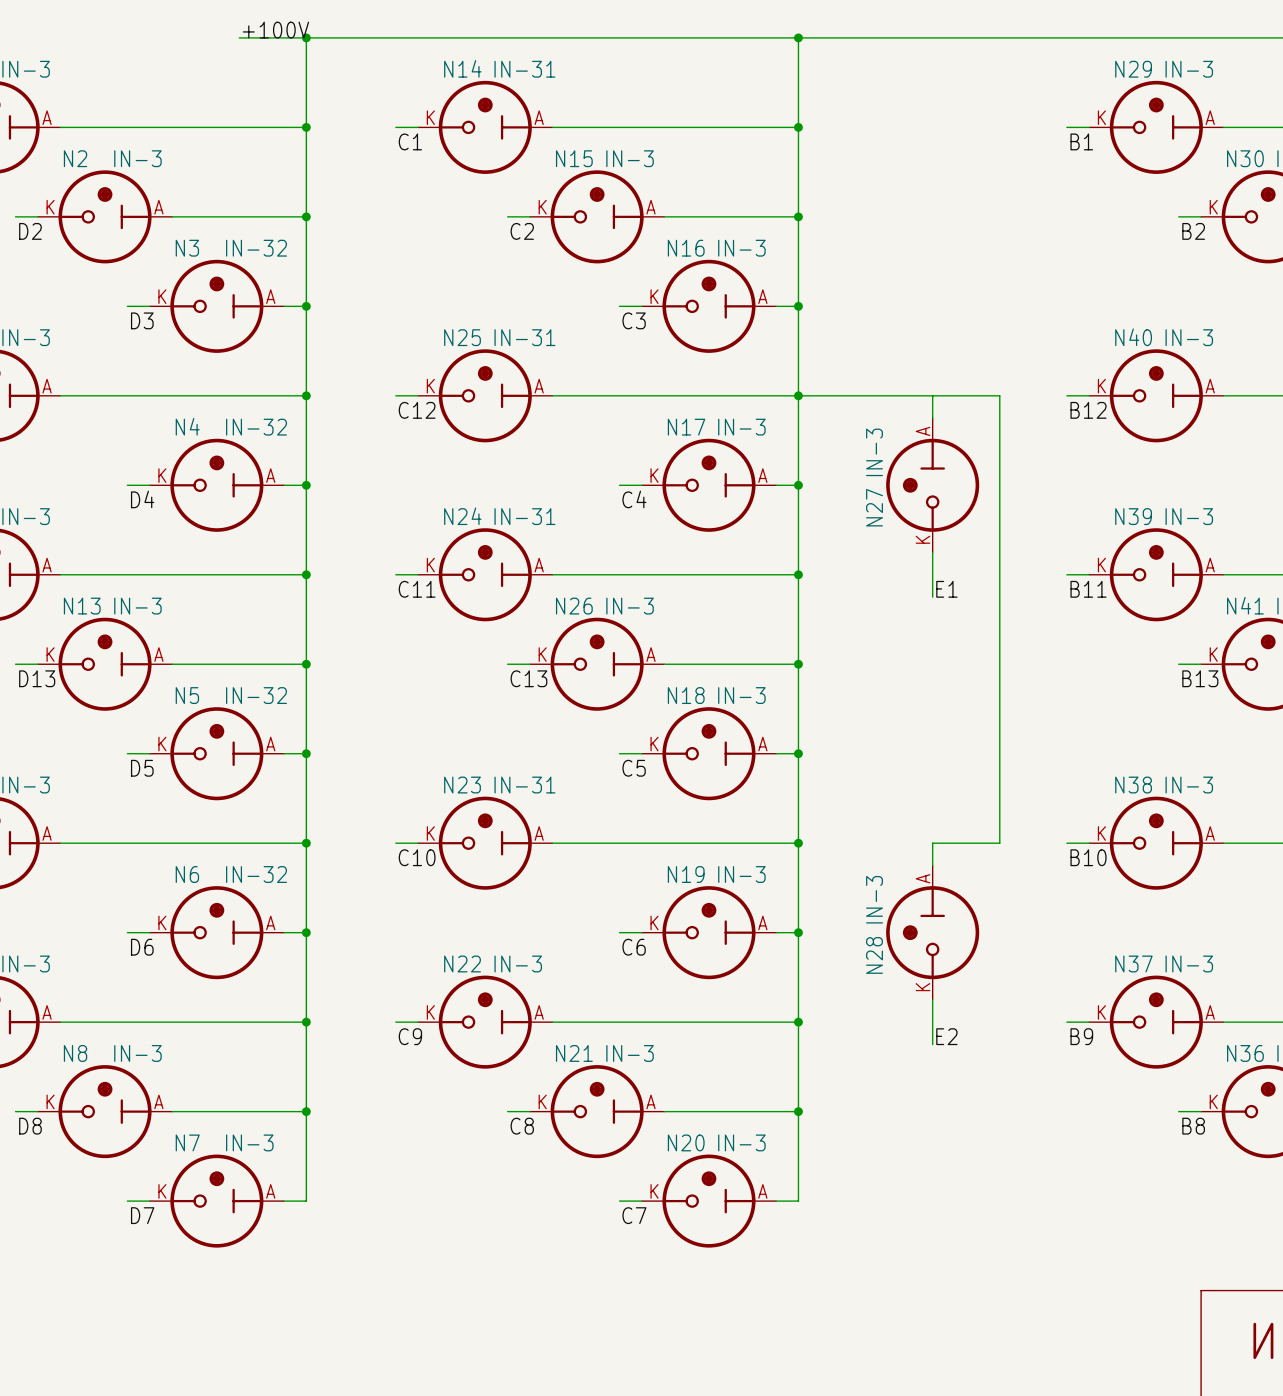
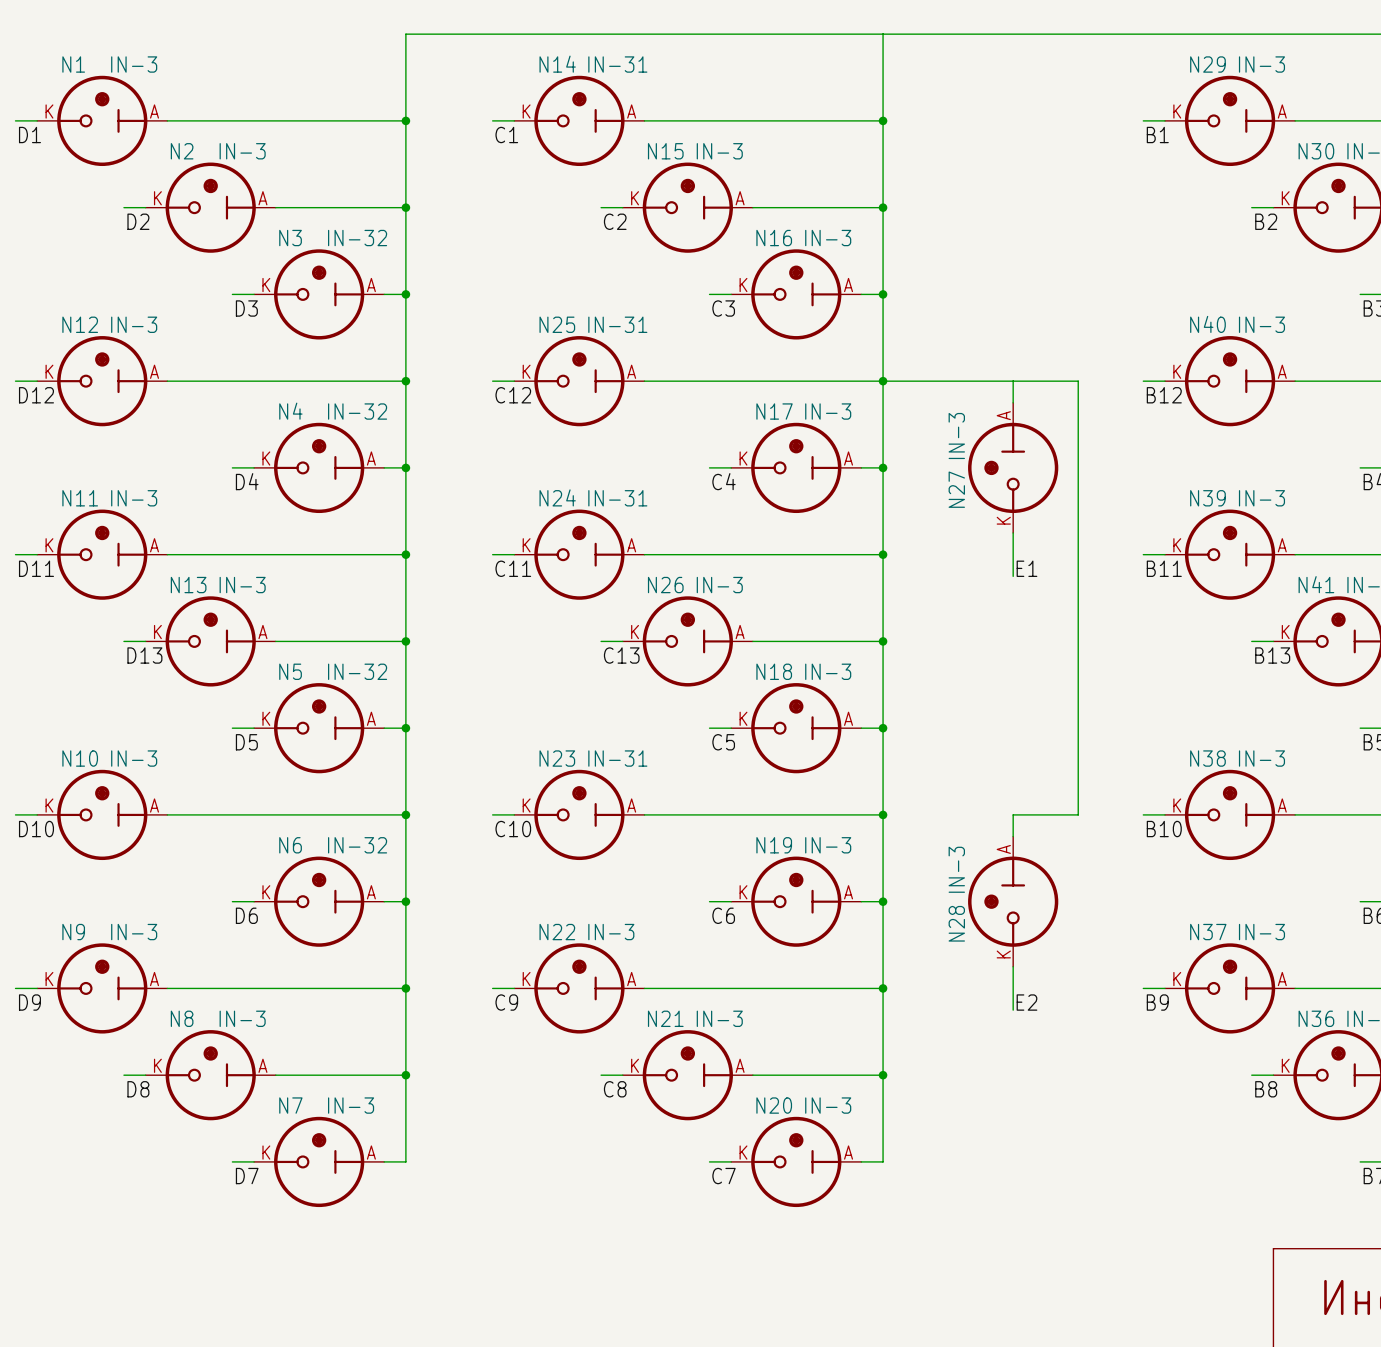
label: +100V (275, 30) -> none
wire: (239, 37) (306, 37) -> none
junction: (306, 37) -> none
junction: (798, 37) -> none

